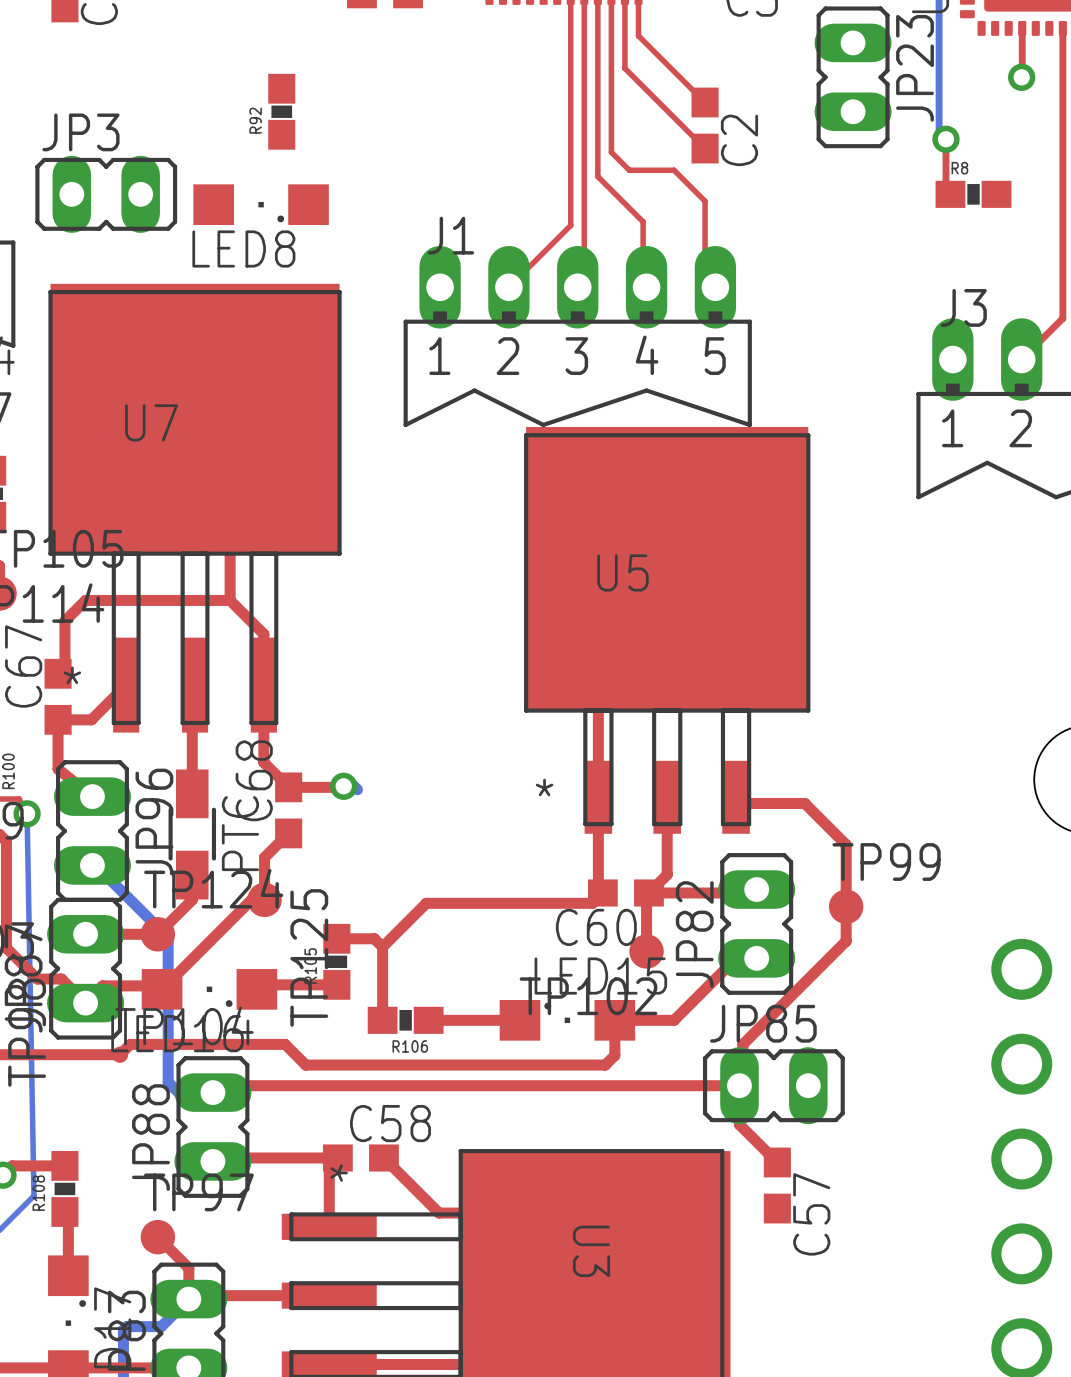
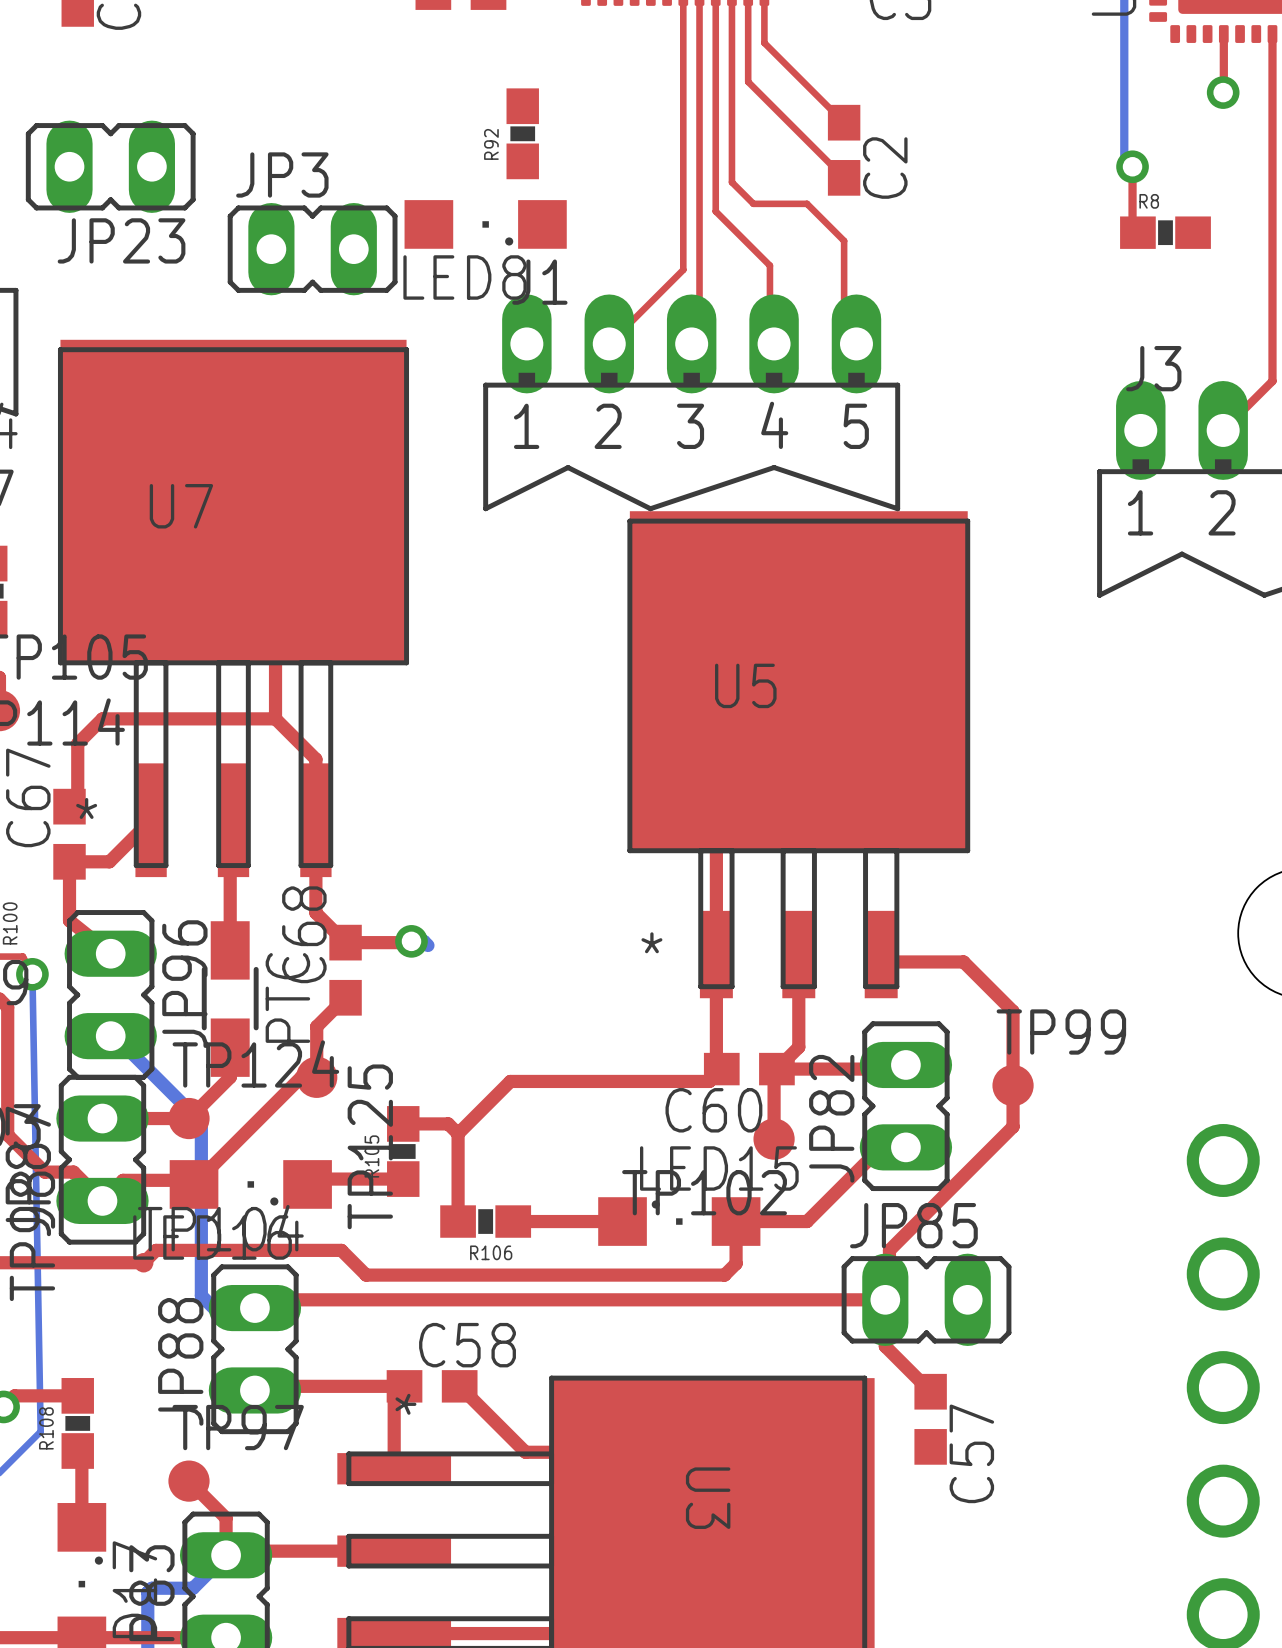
JP23 rotation: 0° (853, 77) -> 90° clockwise (110, 166)
JP23 position: (853, 77) -> (110, 166)
R92 position: (281, 111) -> (522, 133)
JP3 position: (106, 194) -> (312, 249)
LED8 position: (261, 204) -> (485, 224)

